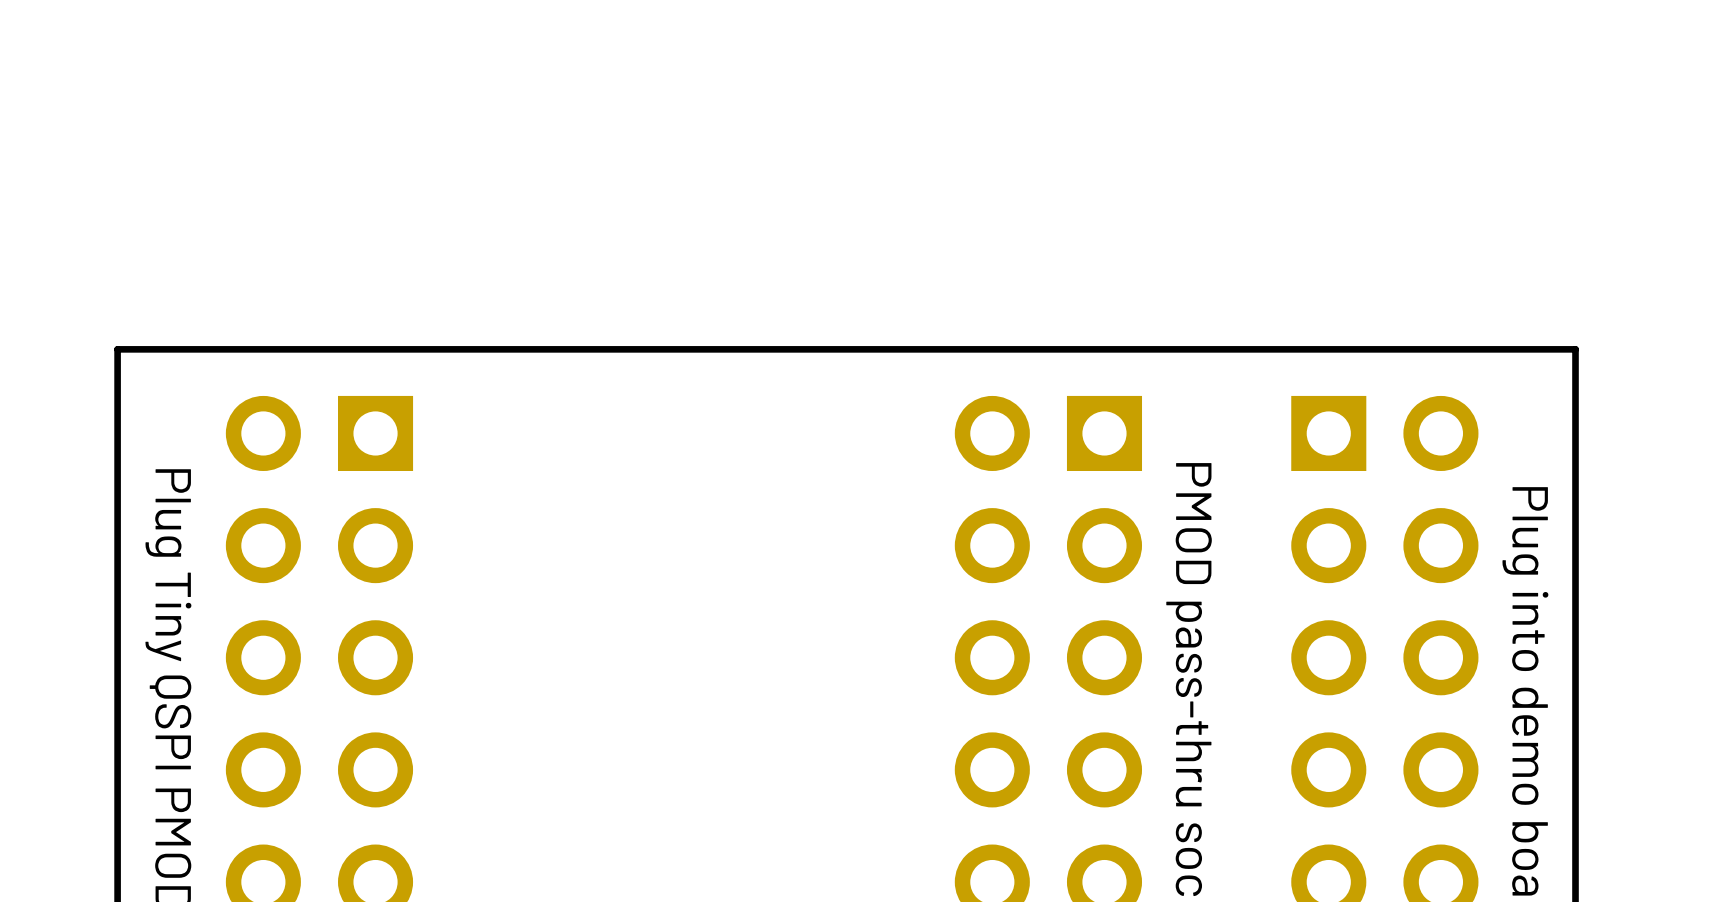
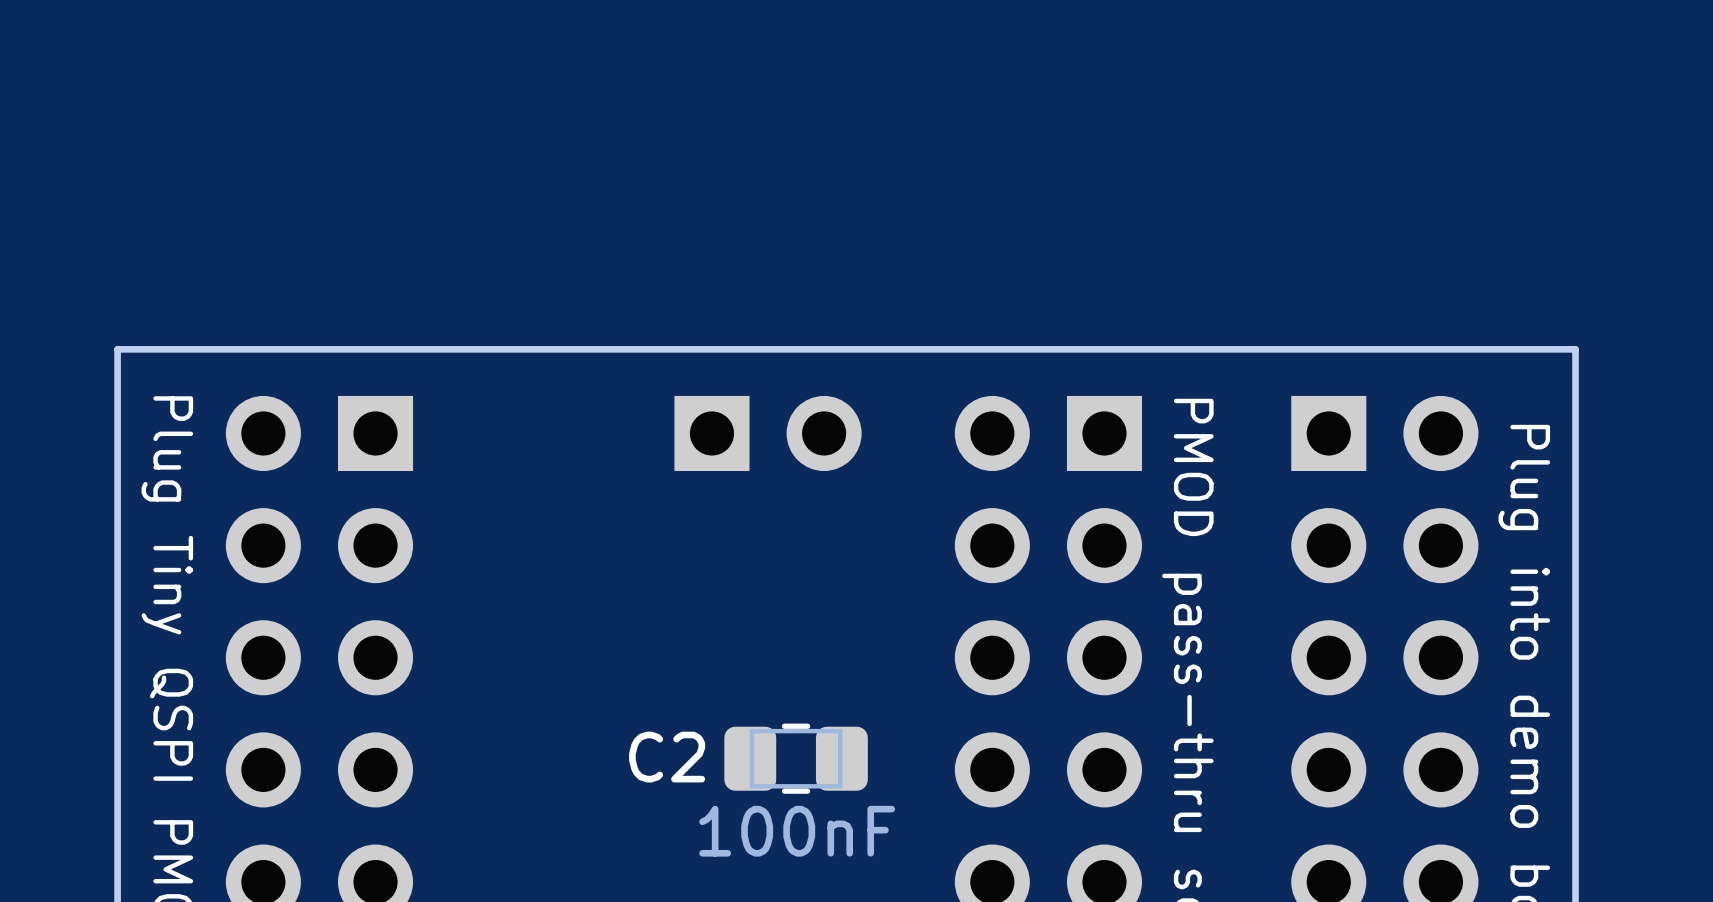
part: none -> (768, 433)
C2: none -> 100nF (796, 758)

